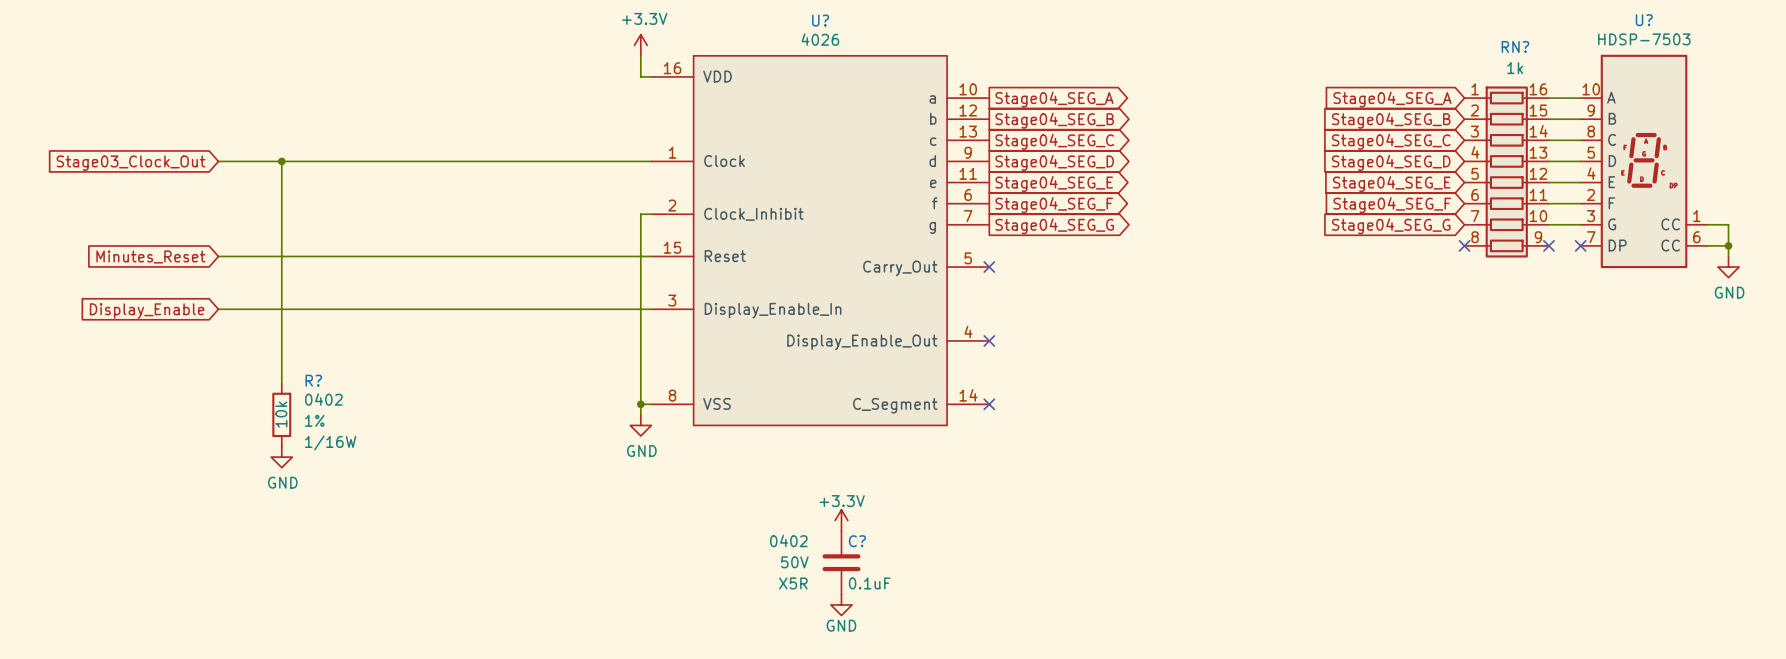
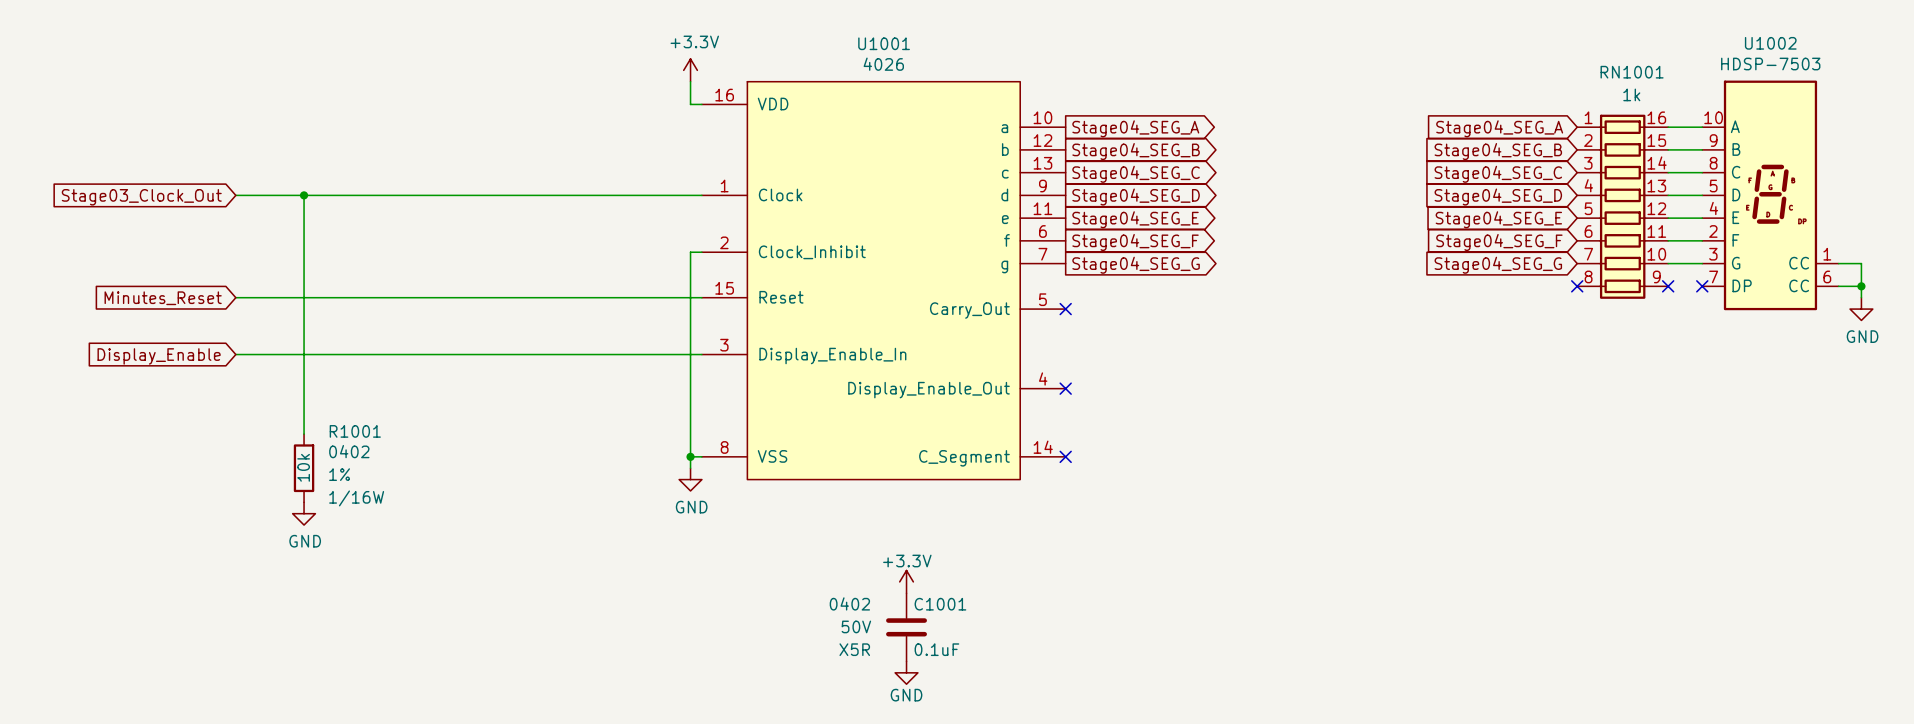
U? name: U? (820, 20) -> U1001 (884, 43)
U? name: U? (1644, 20) -> U1002 (1770, 43)
RN? name: RN? (1515, 46) -> RN1001 (1632, 72)
R? name: R? (313, 380) -> R1001 (355, 431)
C? name: C? (857, 541) -> C1001 (940, 604)

